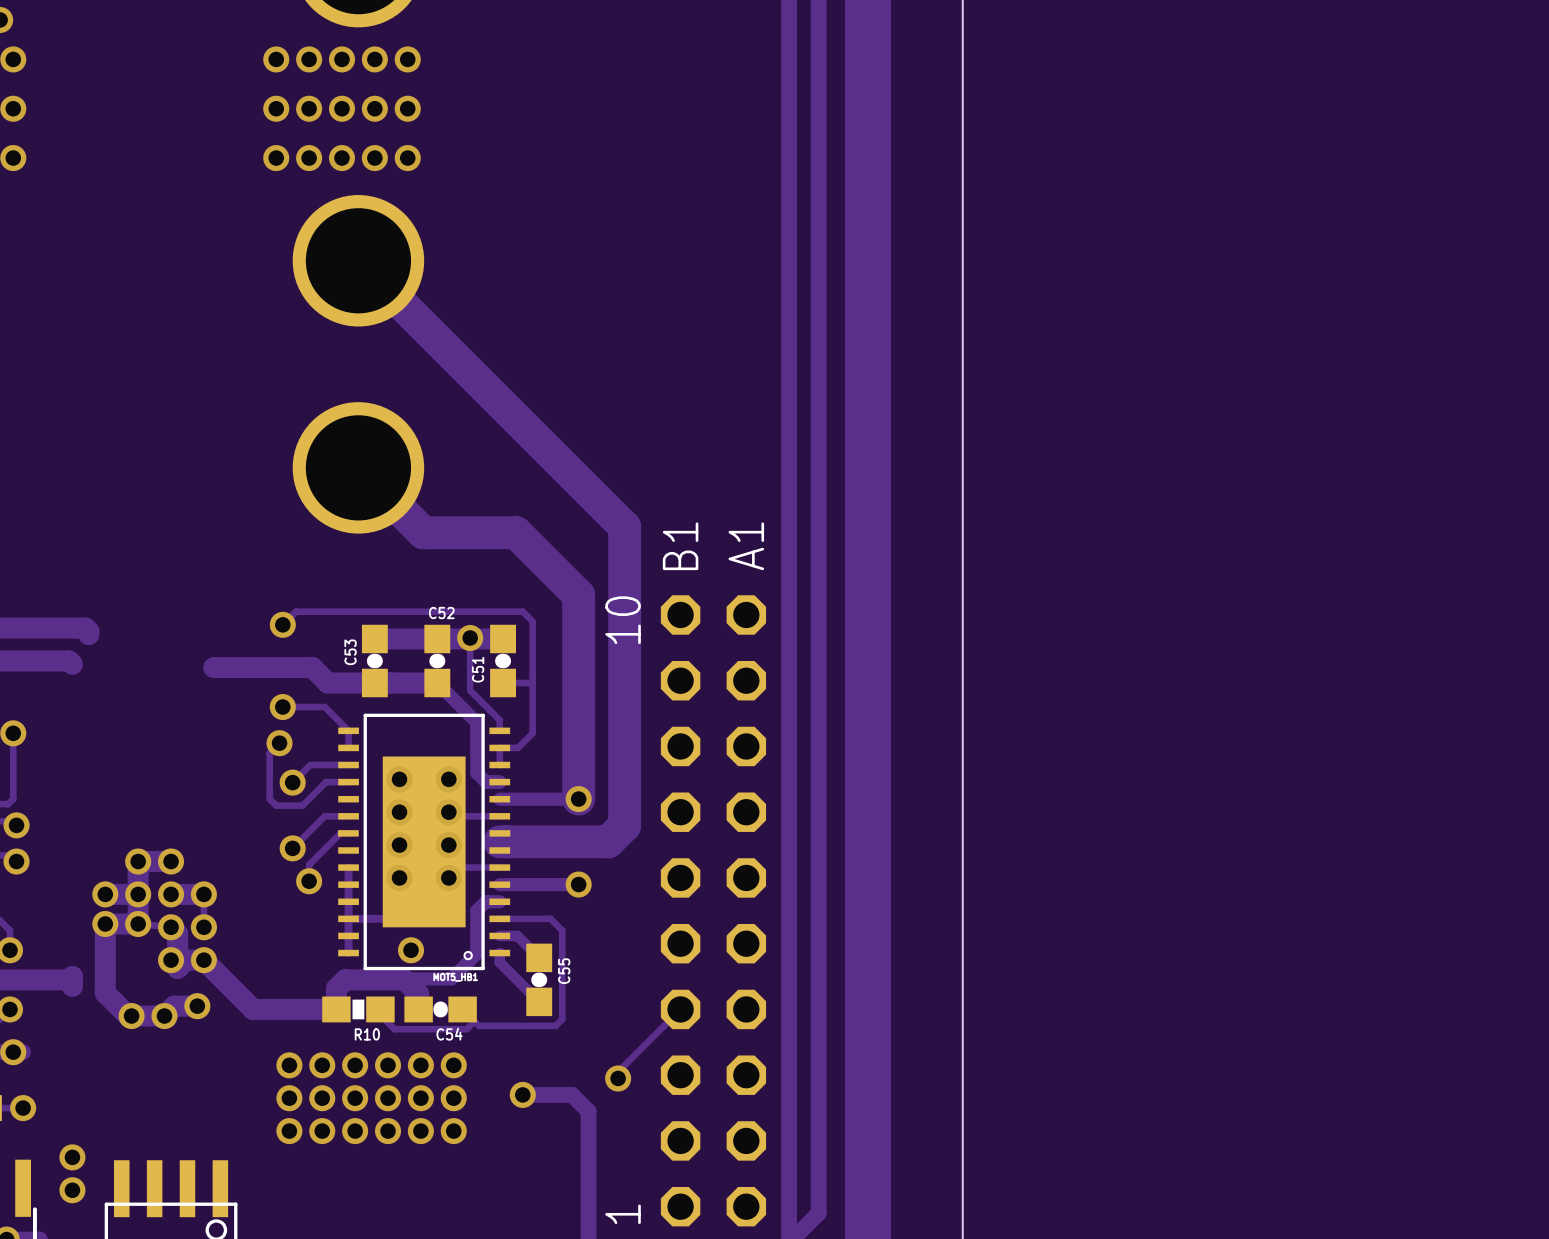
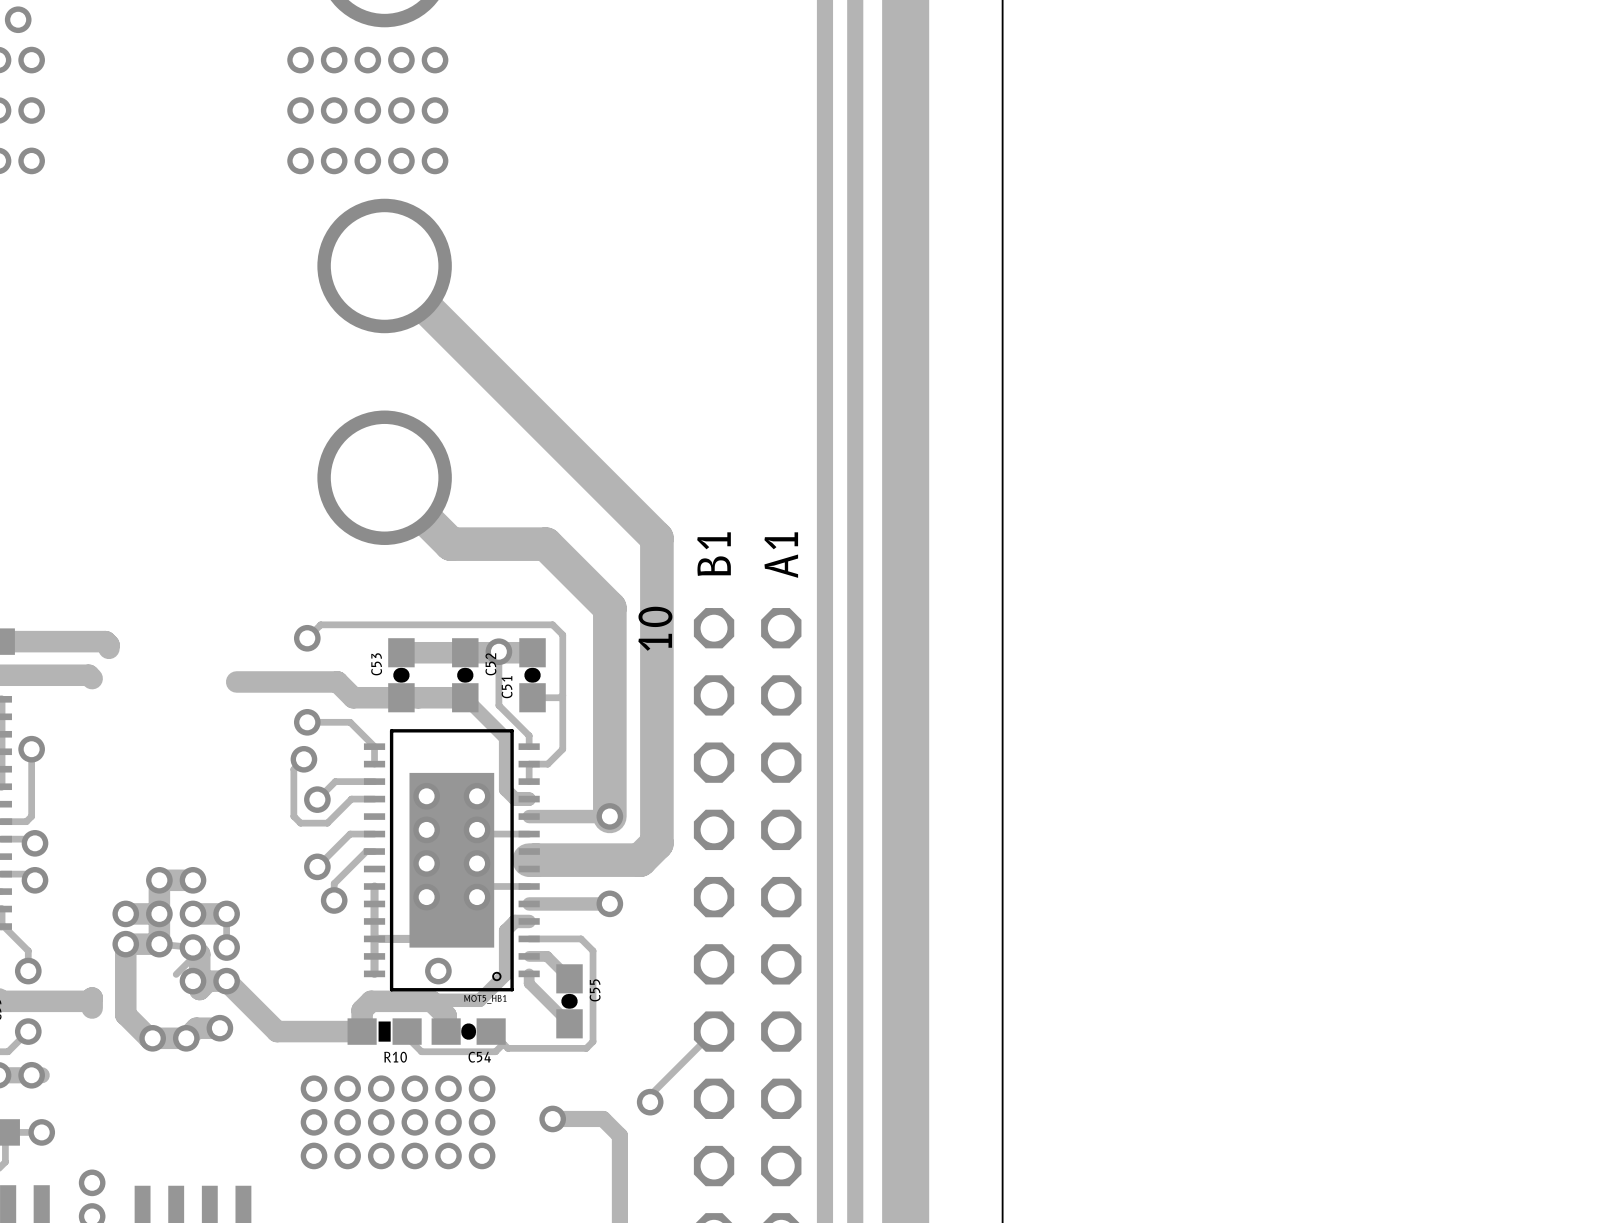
C52 name rotation: 0° (441, 613) -> 90° counterclockwise (490, 664)
C52 name position: C52 (441, 613) -> C52 (490, 664)
track: none -> (193, 957) (176, 974)

